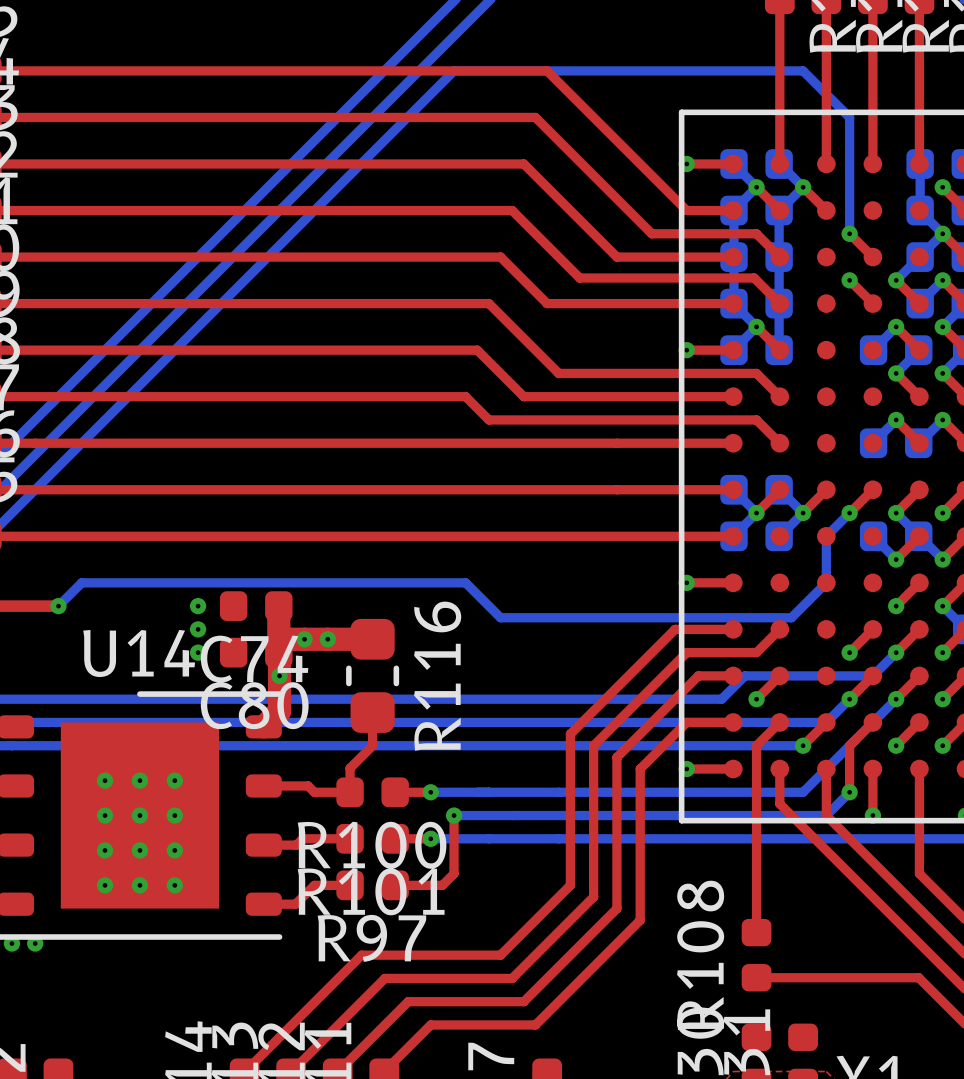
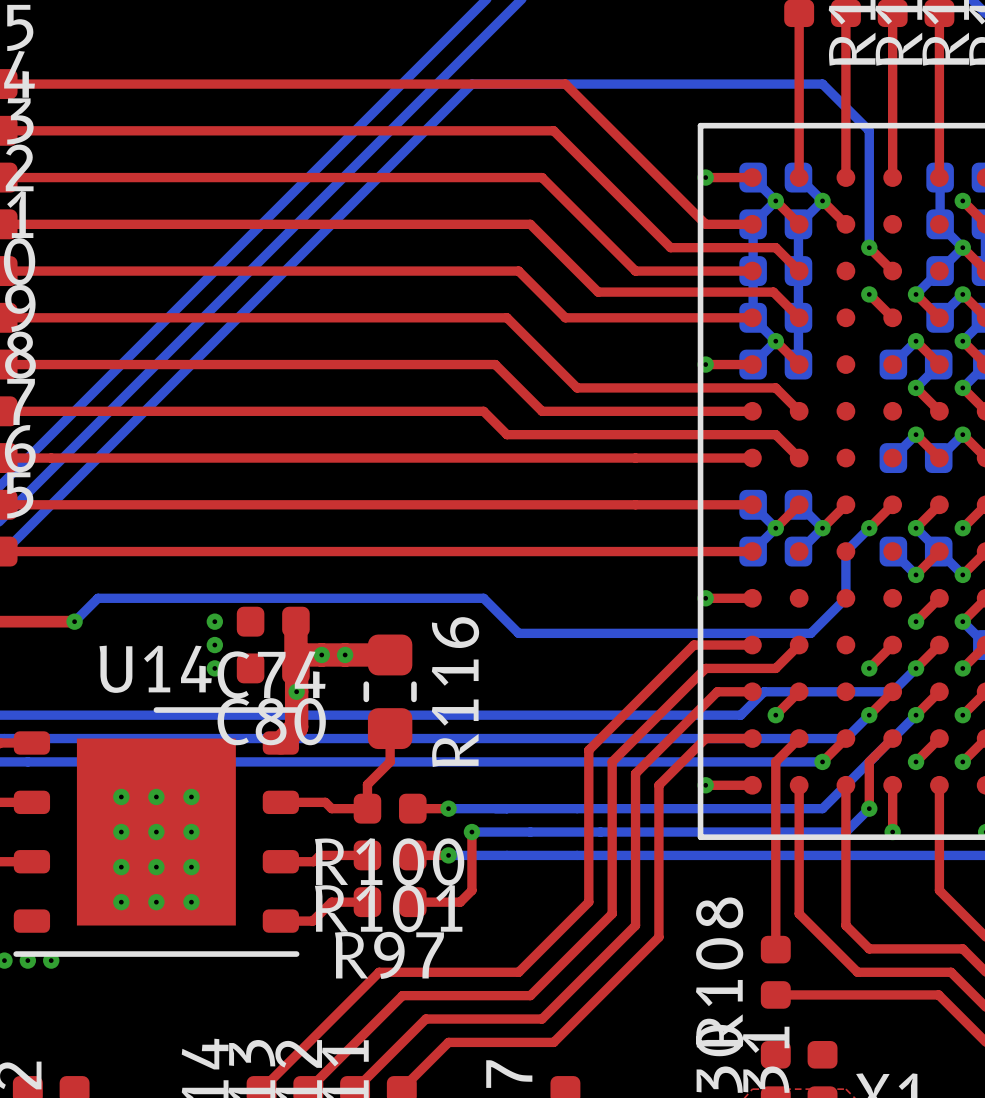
top track: (779, 803) (931, 955) -> (799, 820) (799, 913) (857, 972) (951, 972)
top track: (826, 815) (942, 931) -> (845, 832) (845, 925) (869, 948) (962, 948)

